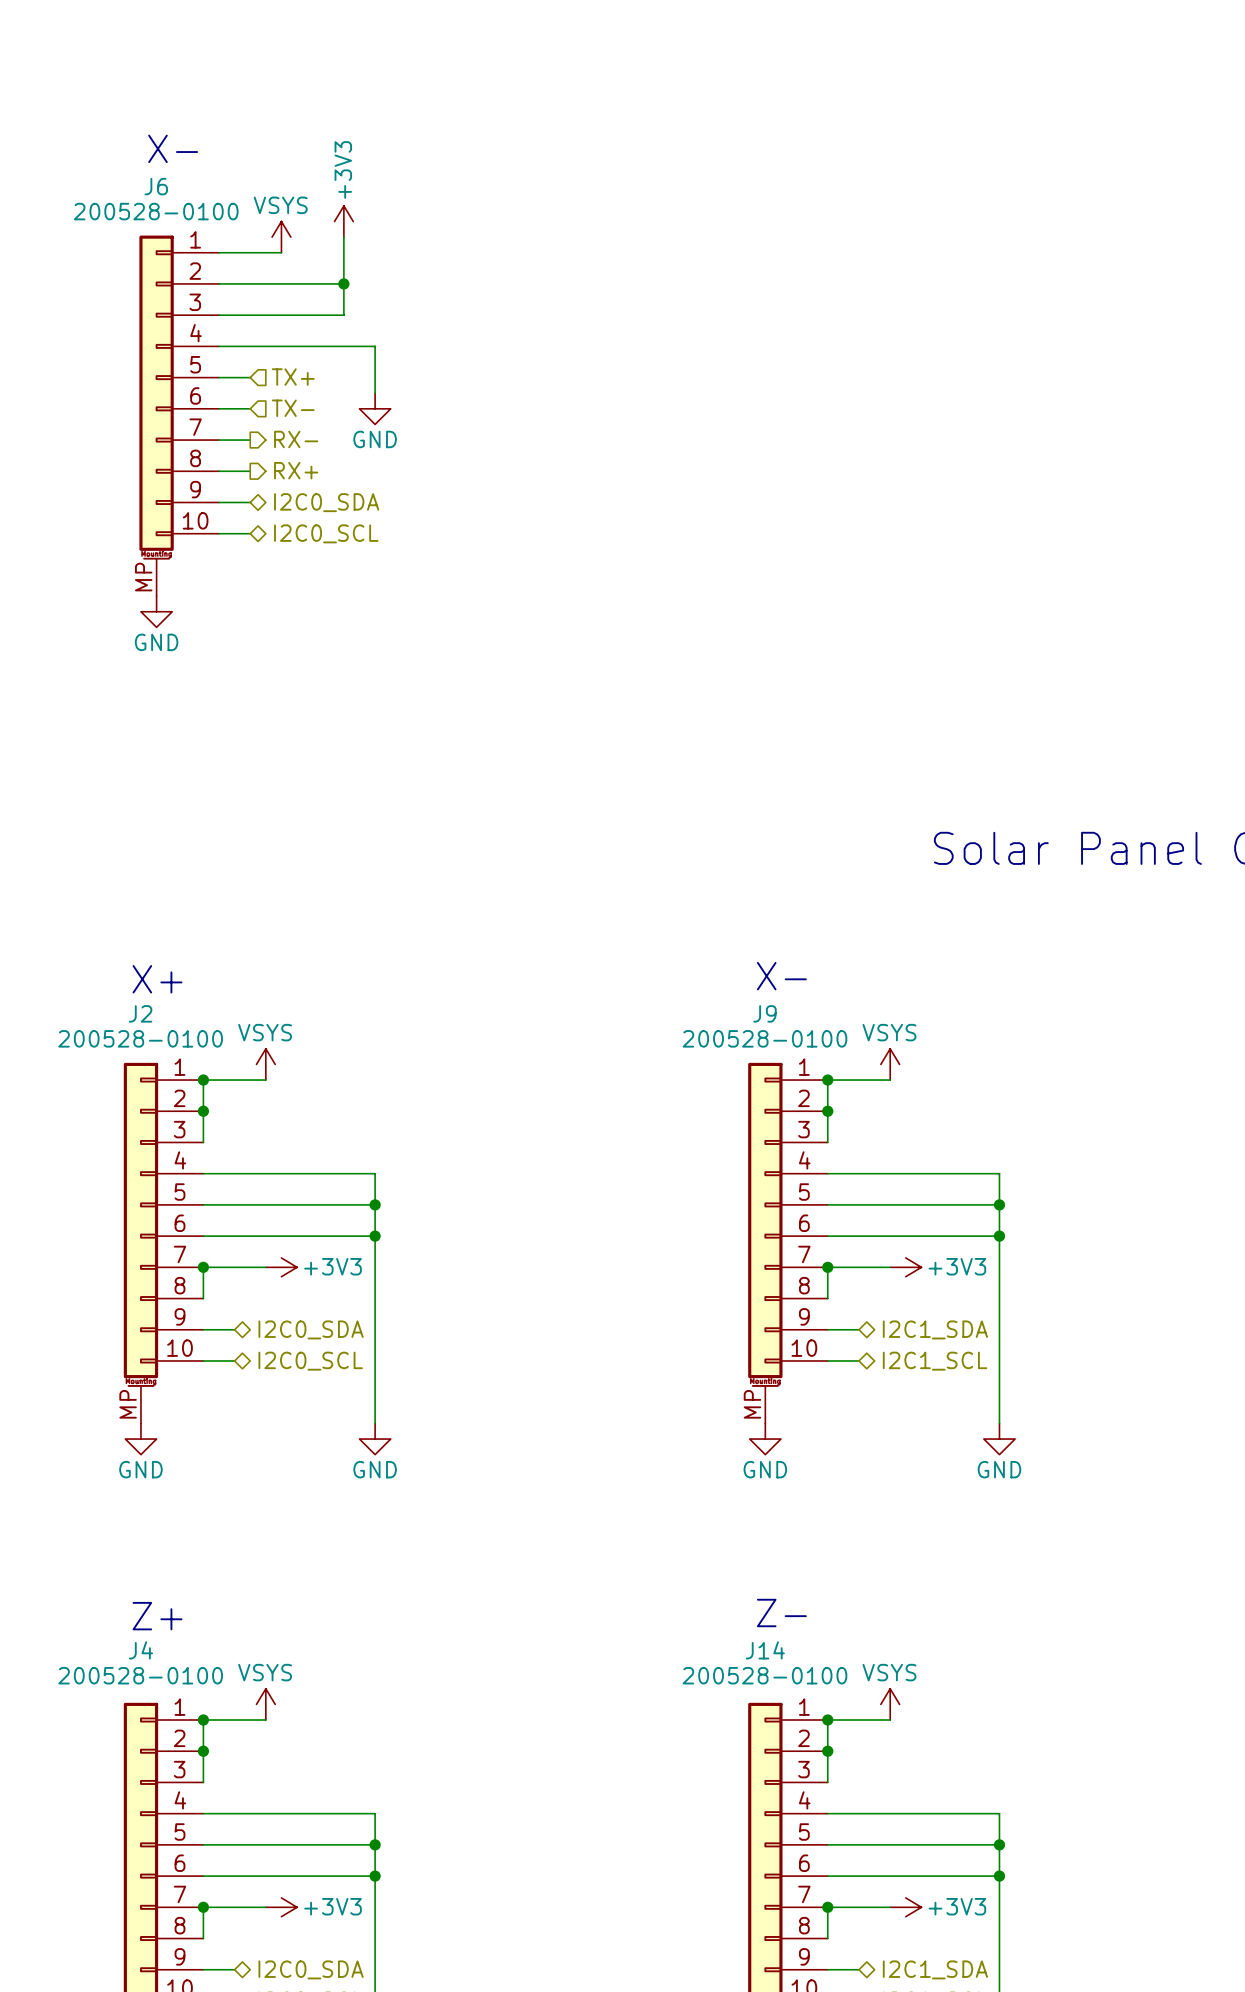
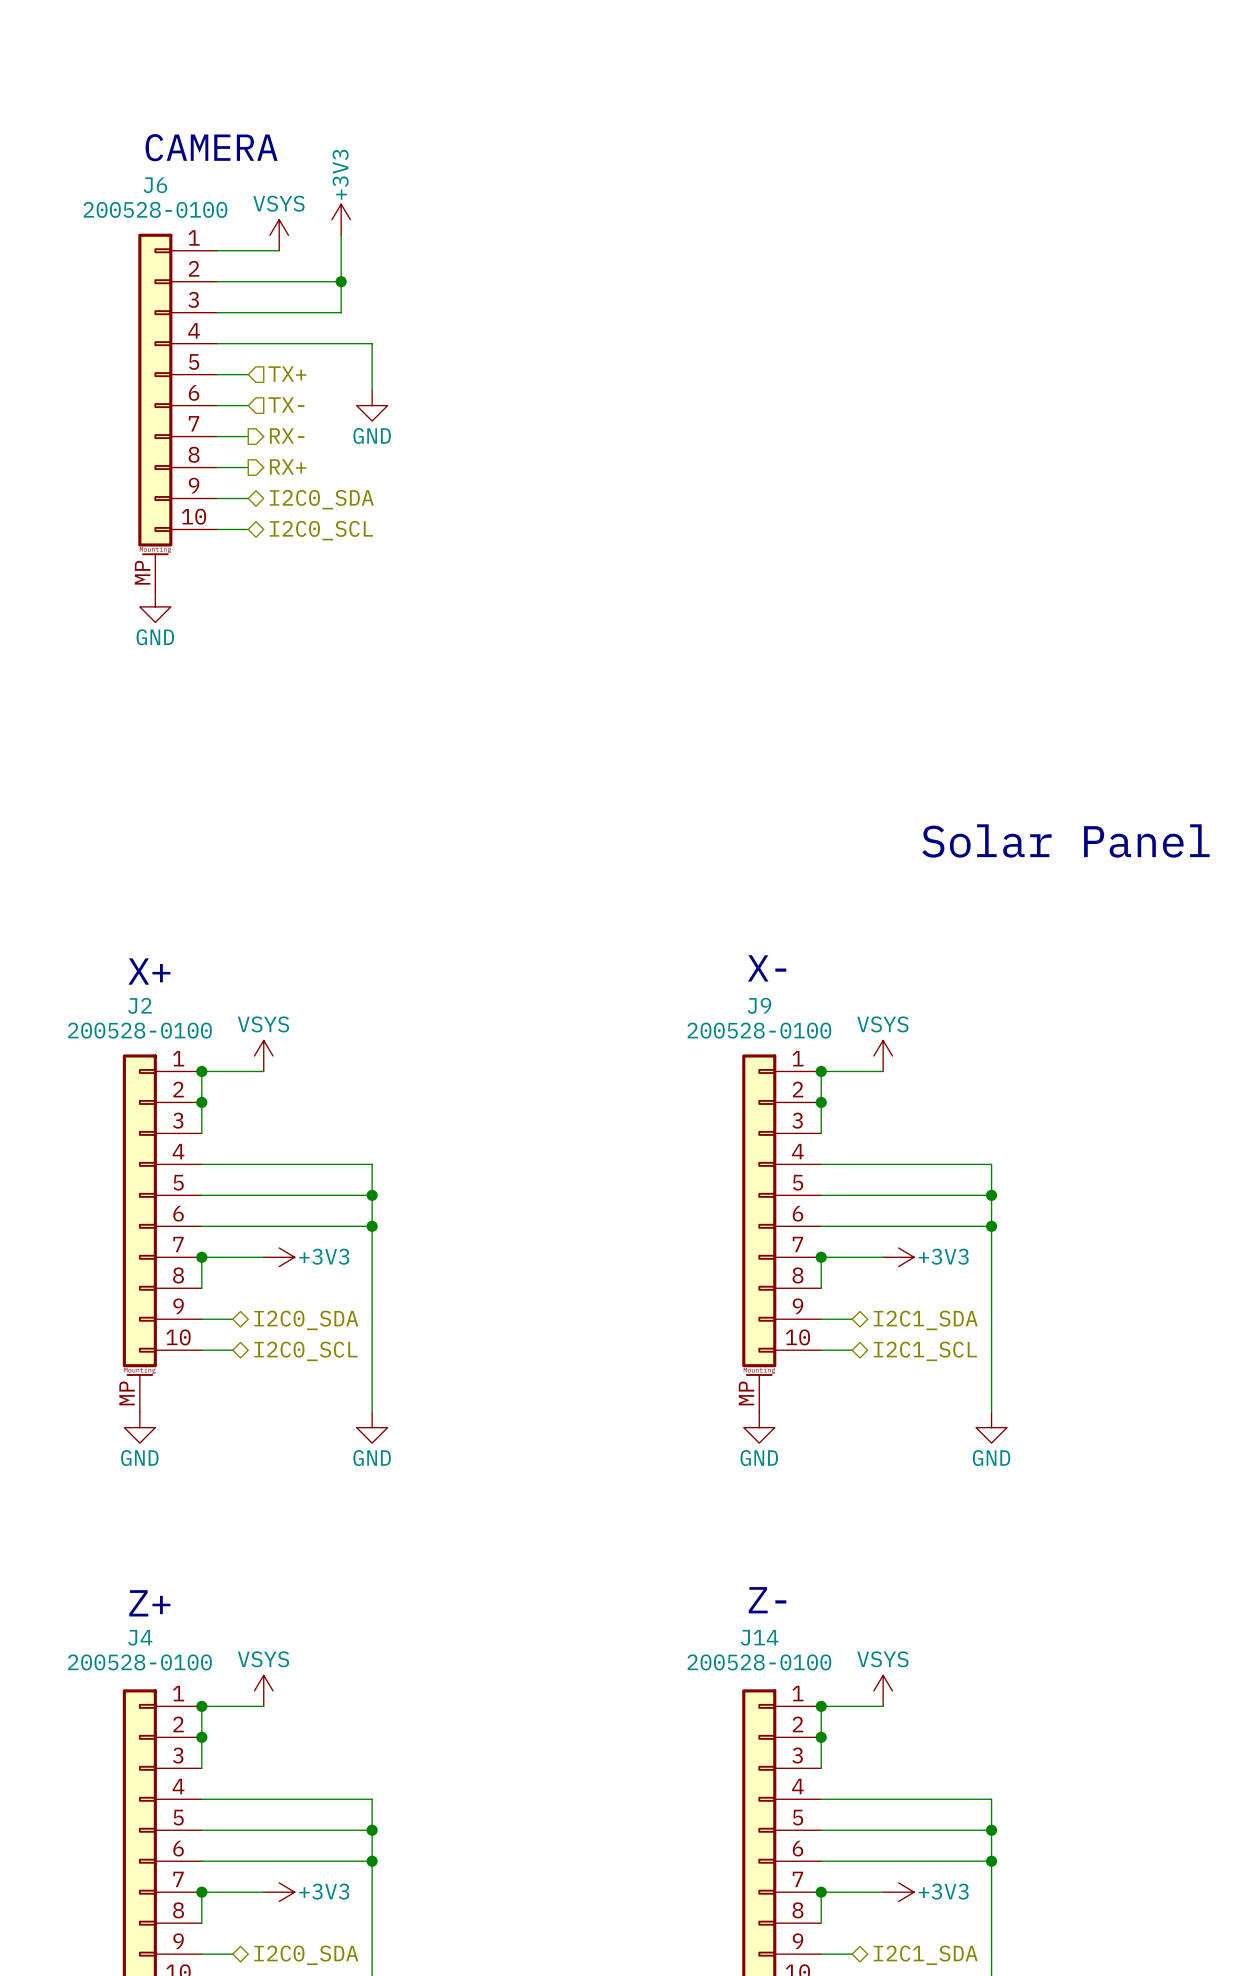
text: X- (173, 148) -> CAMERA (211, 147)

